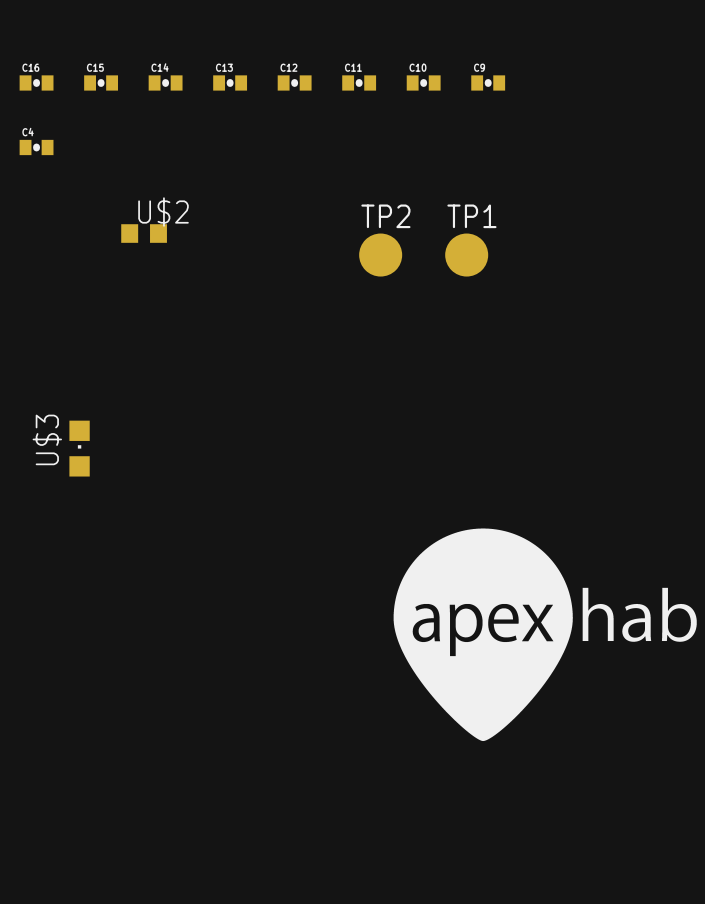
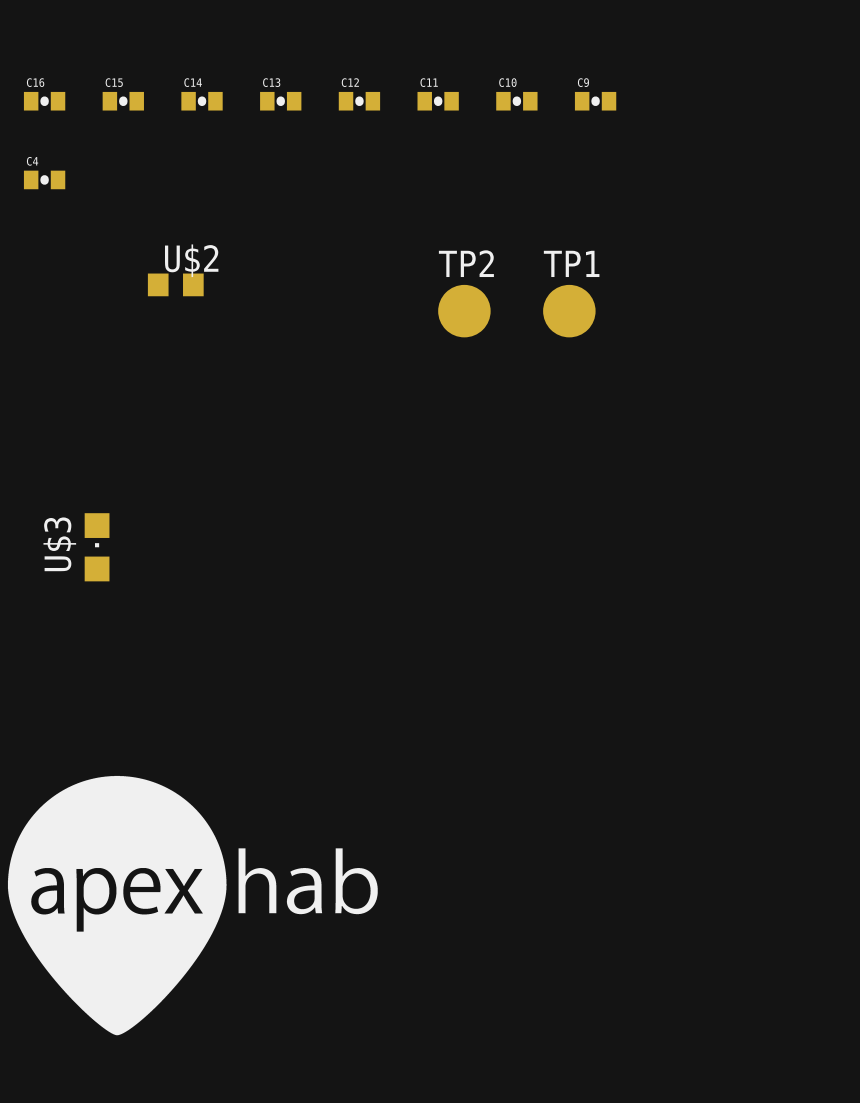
drawing position: (545, 634) -> (192, 905)

